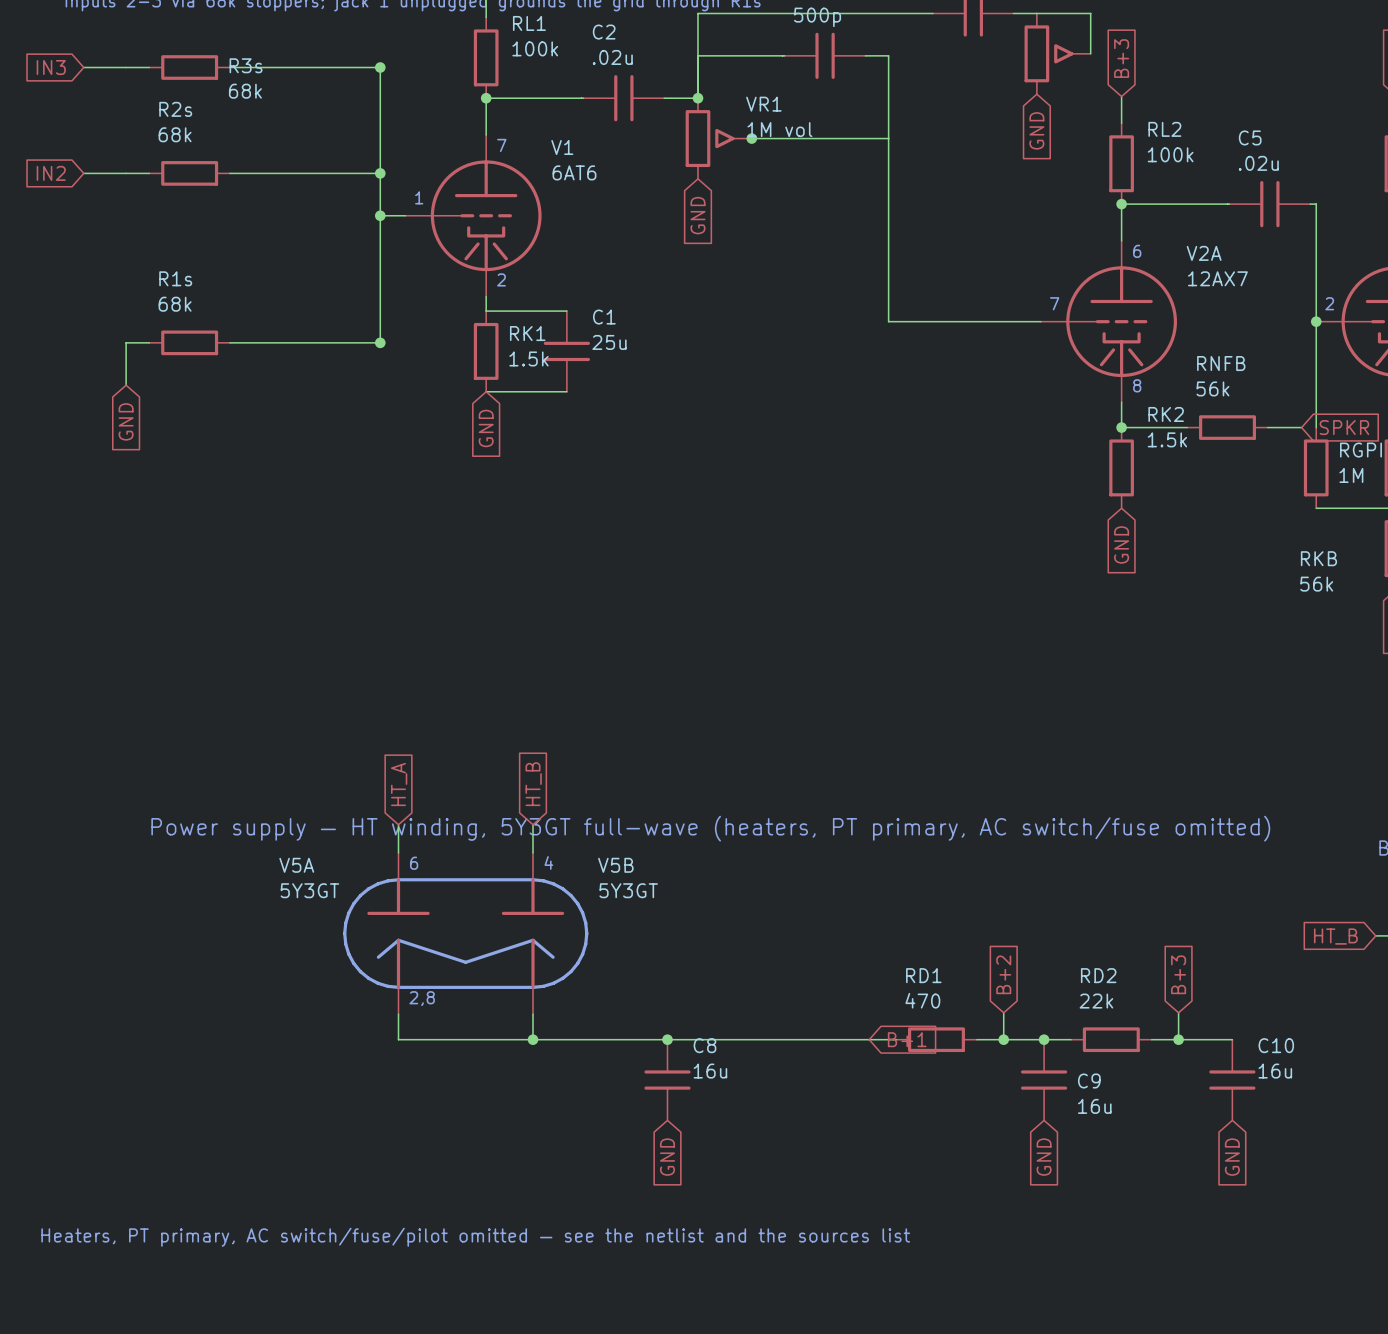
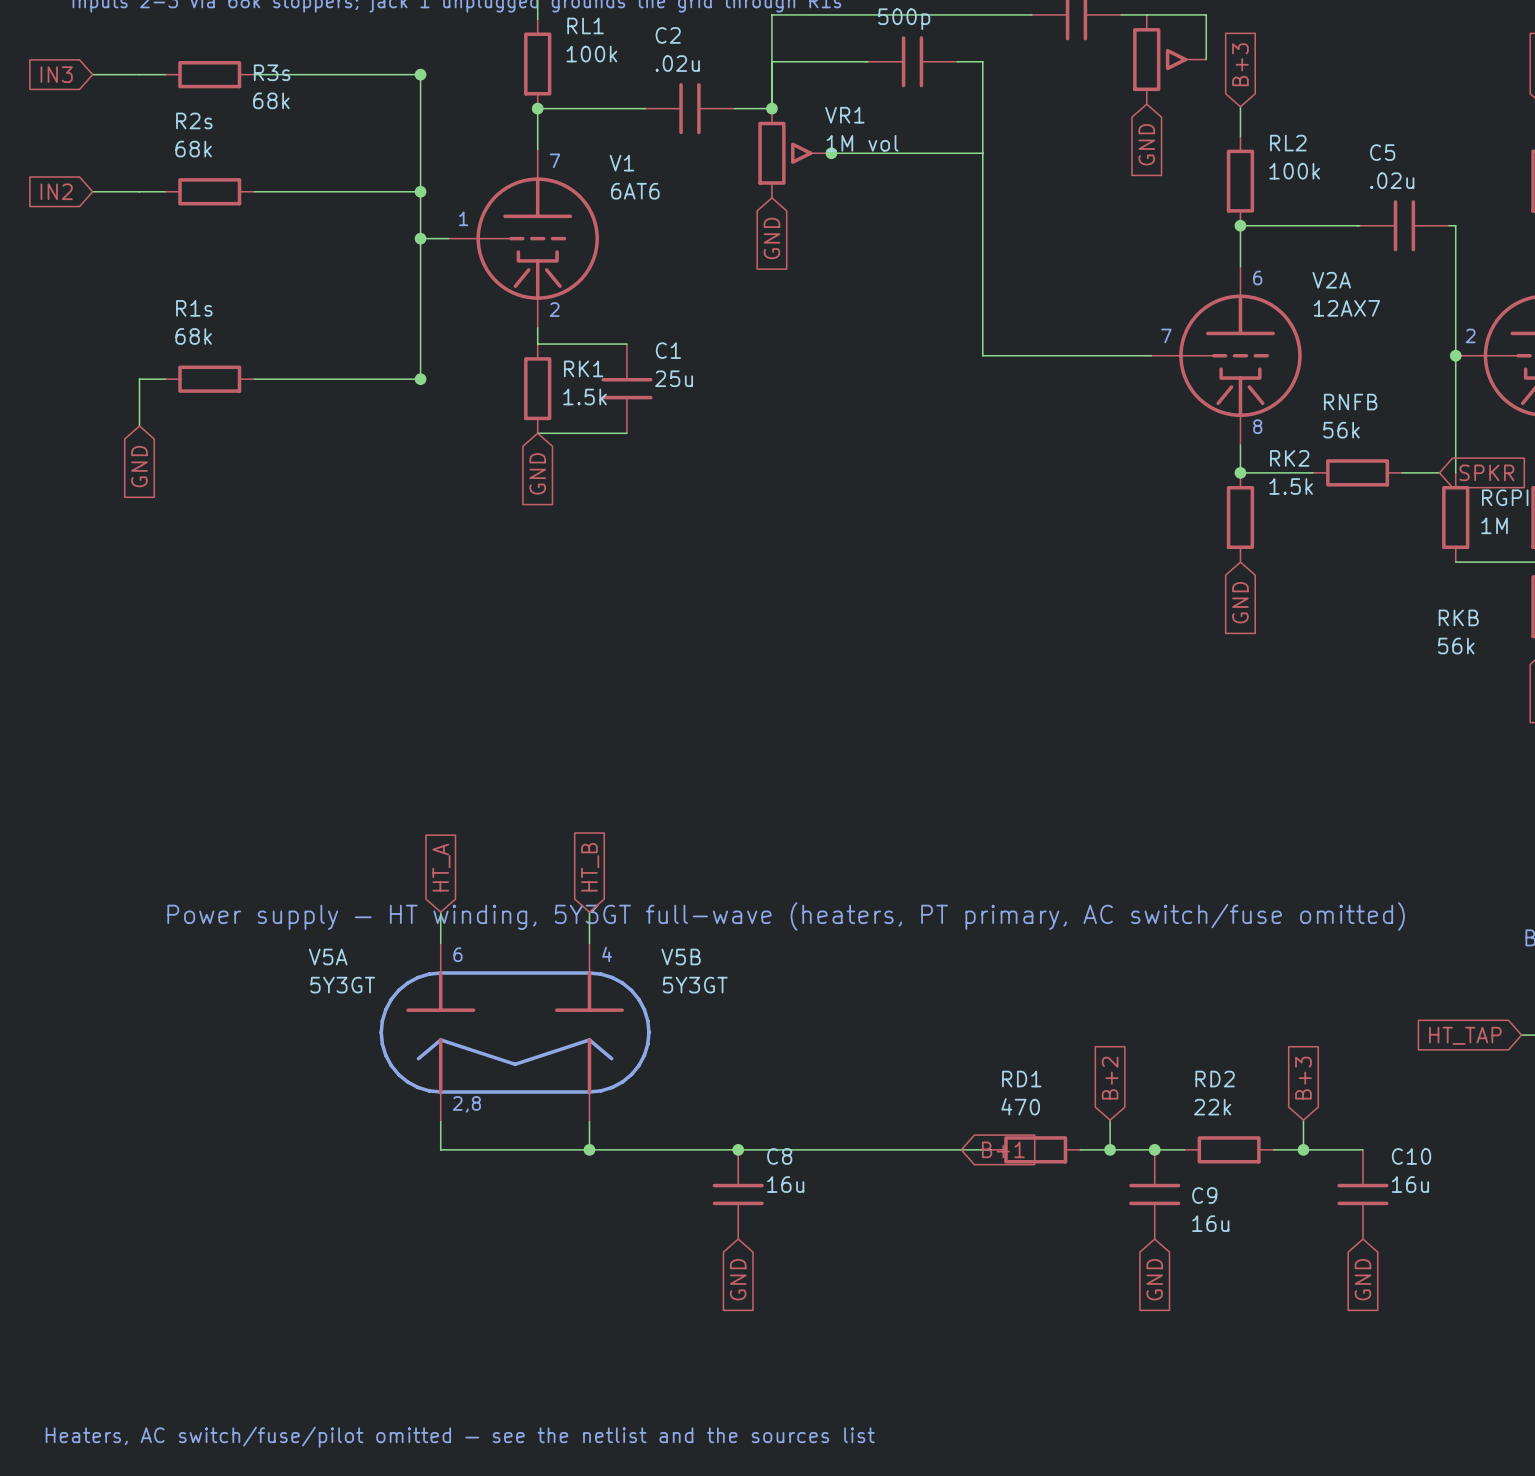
global label: HT_B (1335, 936) -> HT_TAP (1465, 1035)
text: Heaters, PT primary, AC switch/fuse/pilot omitted — see the netlist and the sources list (475, 1237) -> none
text: none -> Heaters, AC switch/fuse/pilot omitted — see the netlist and the sources list (460, 1437)

